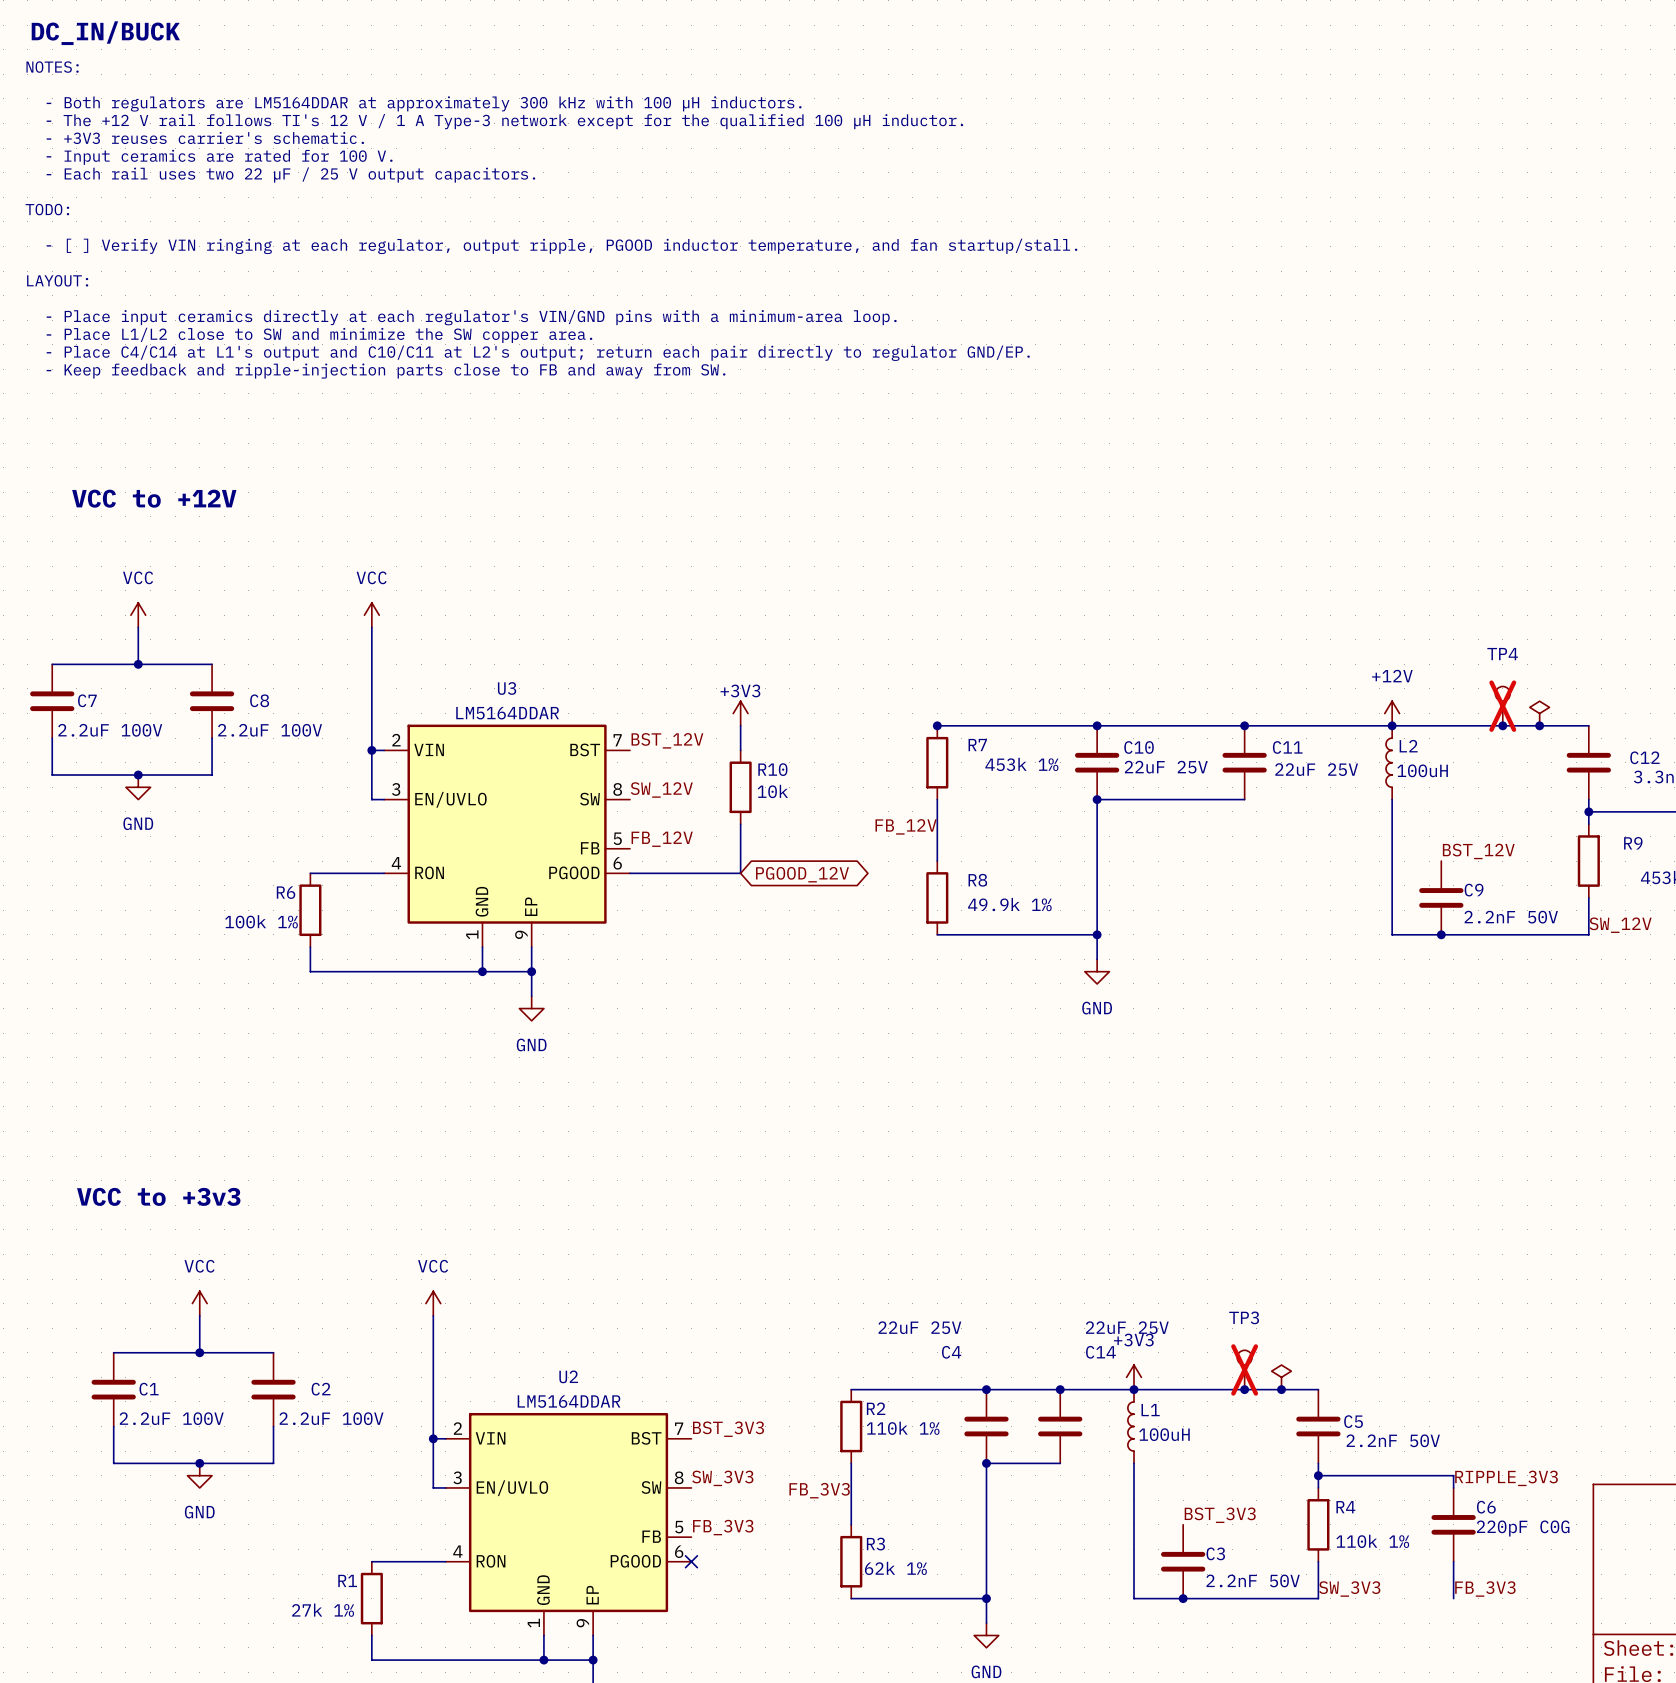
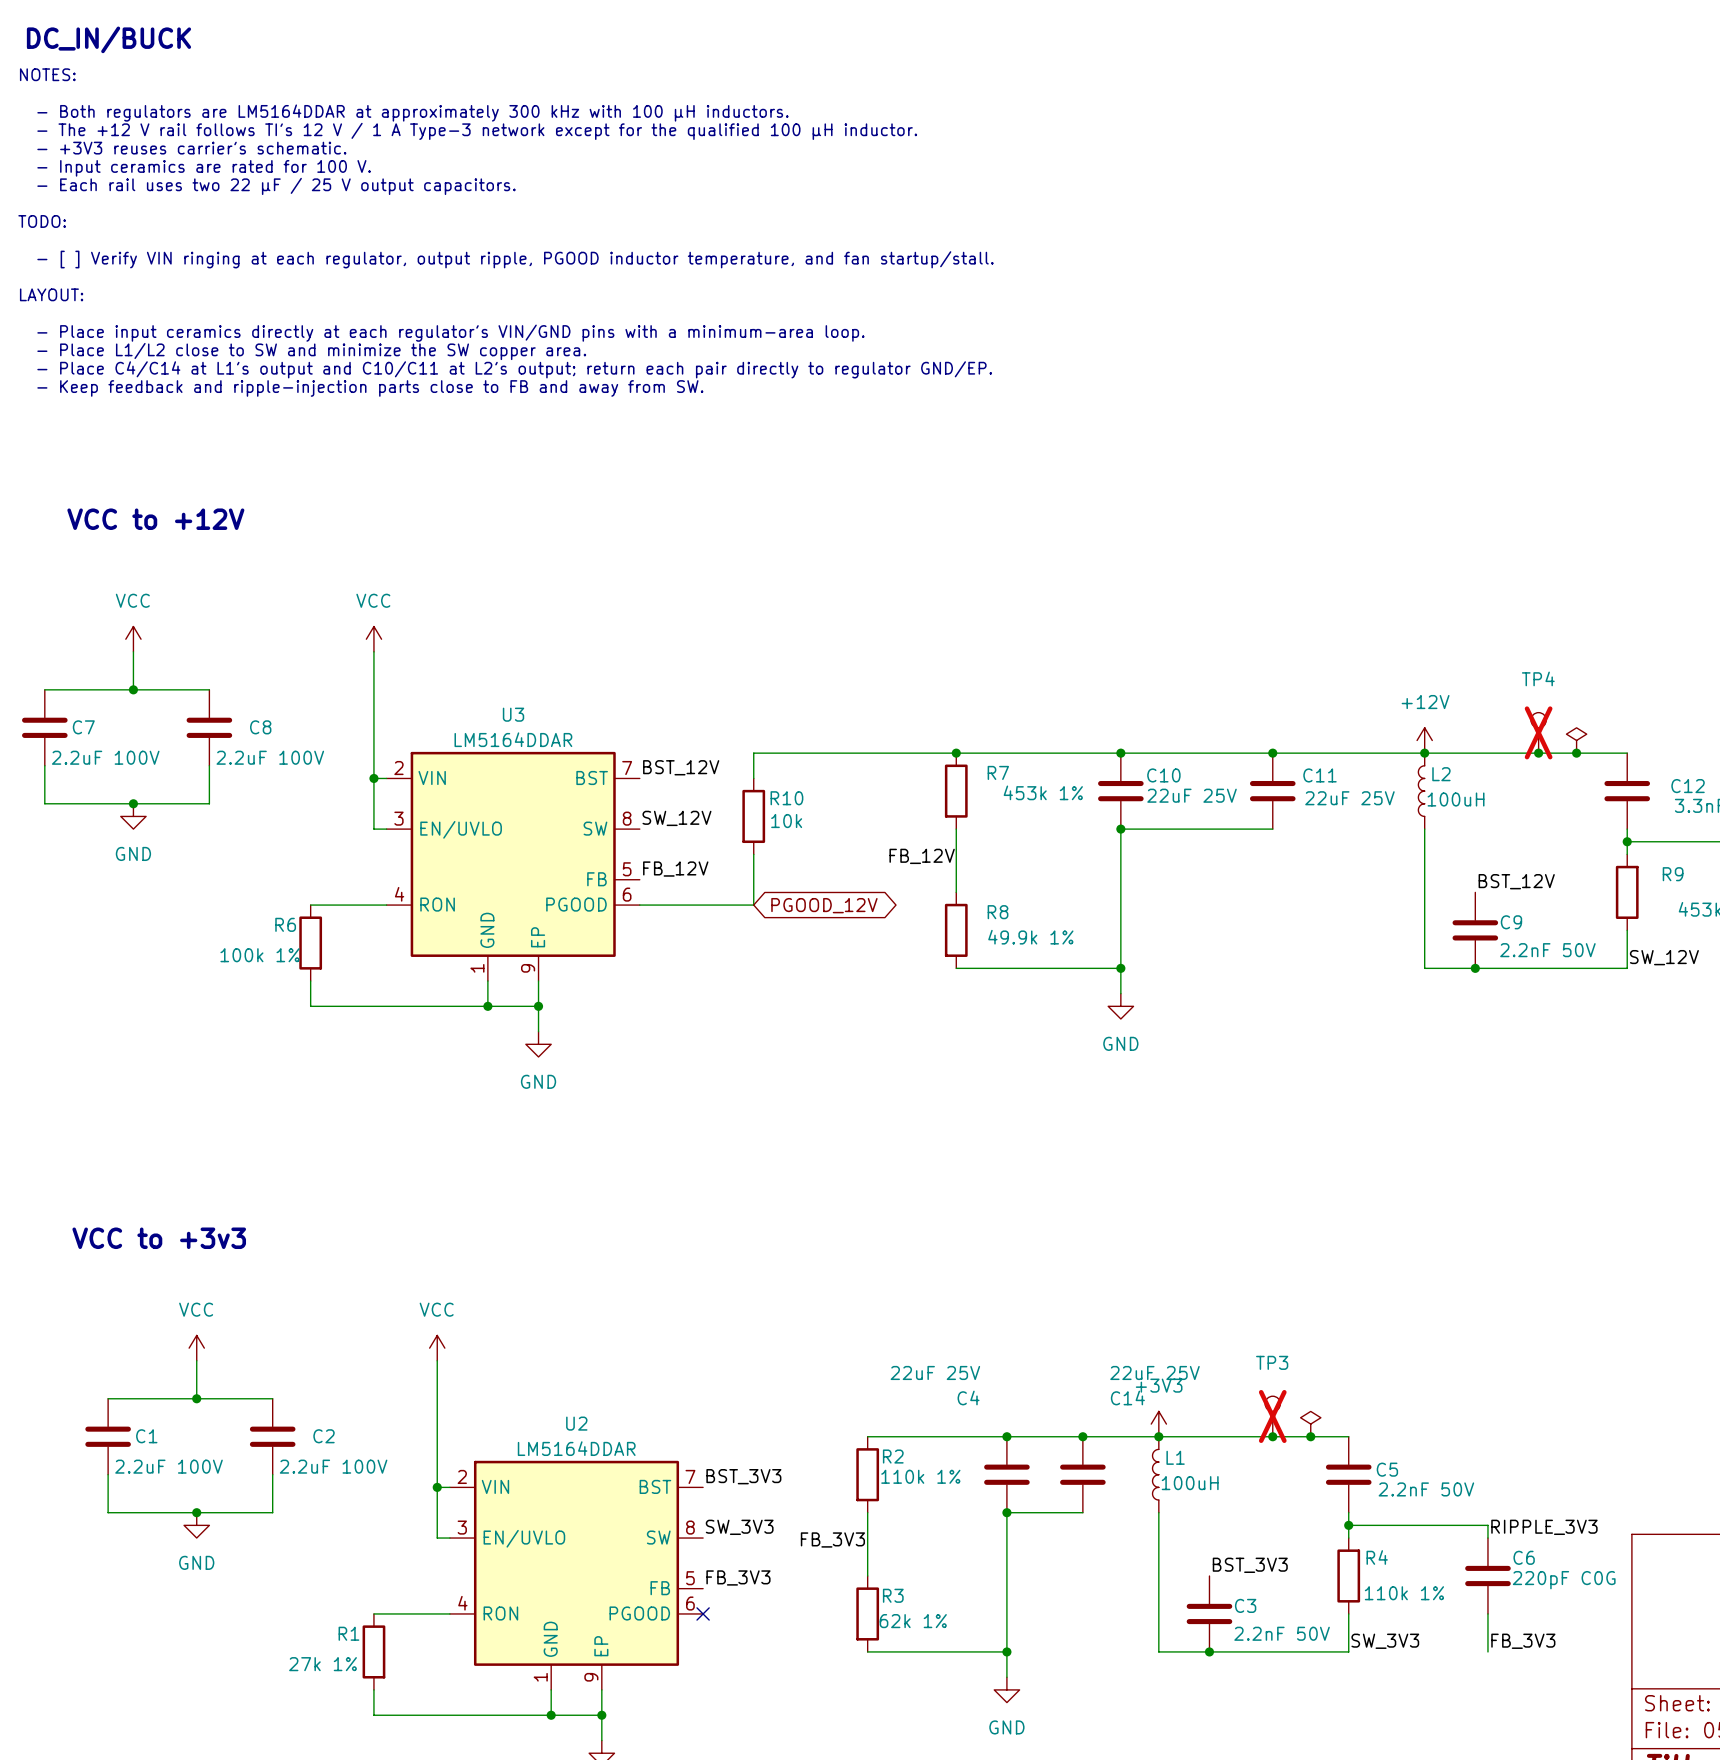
power symbol: +3V3 (740, 713) -> none
wire: none -> (753, 753) (956, 753)

